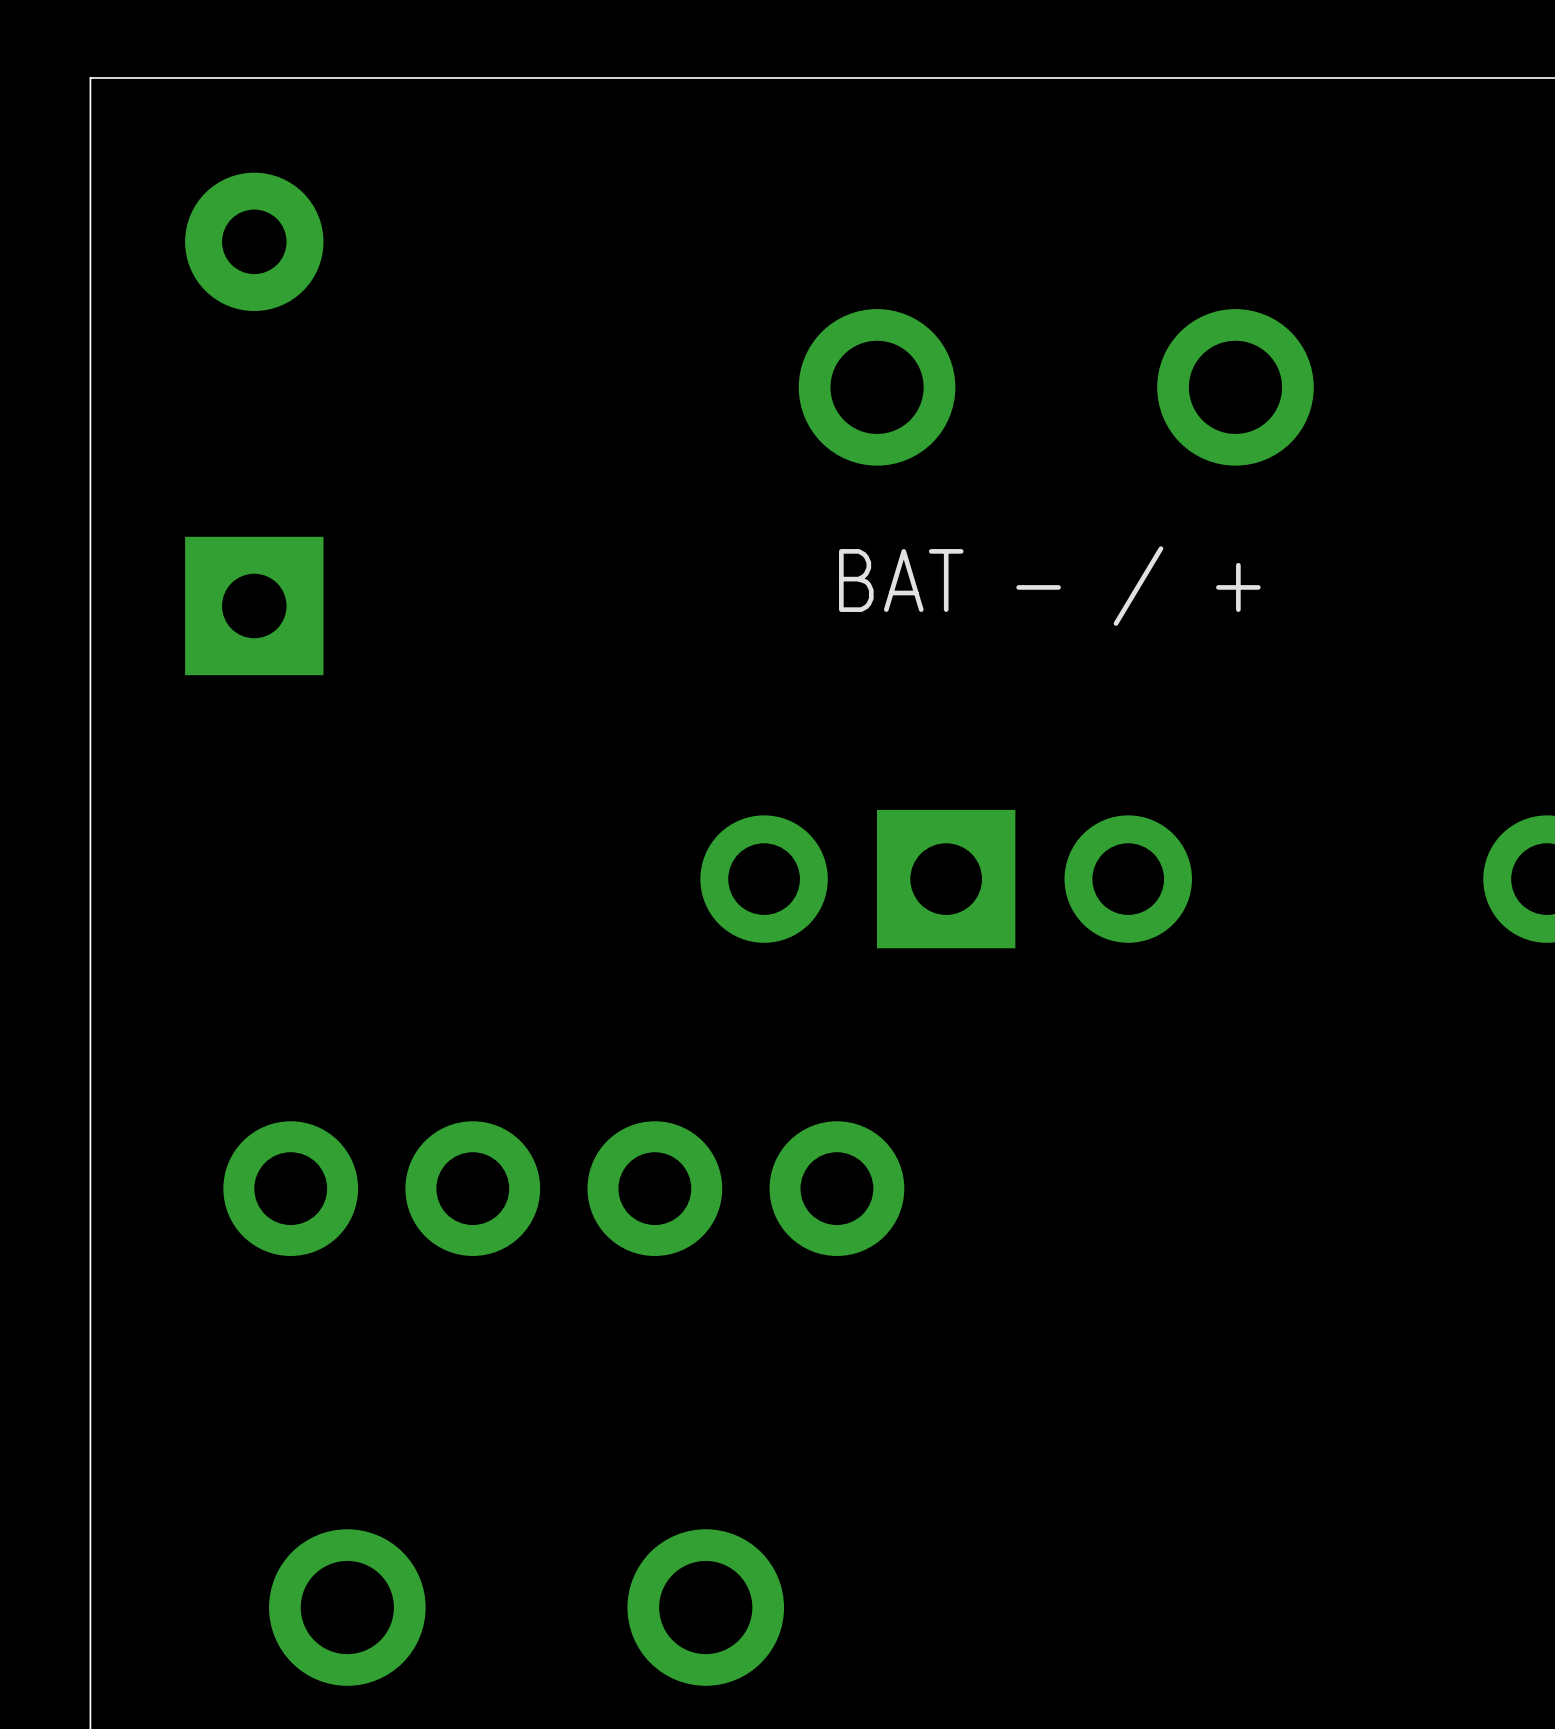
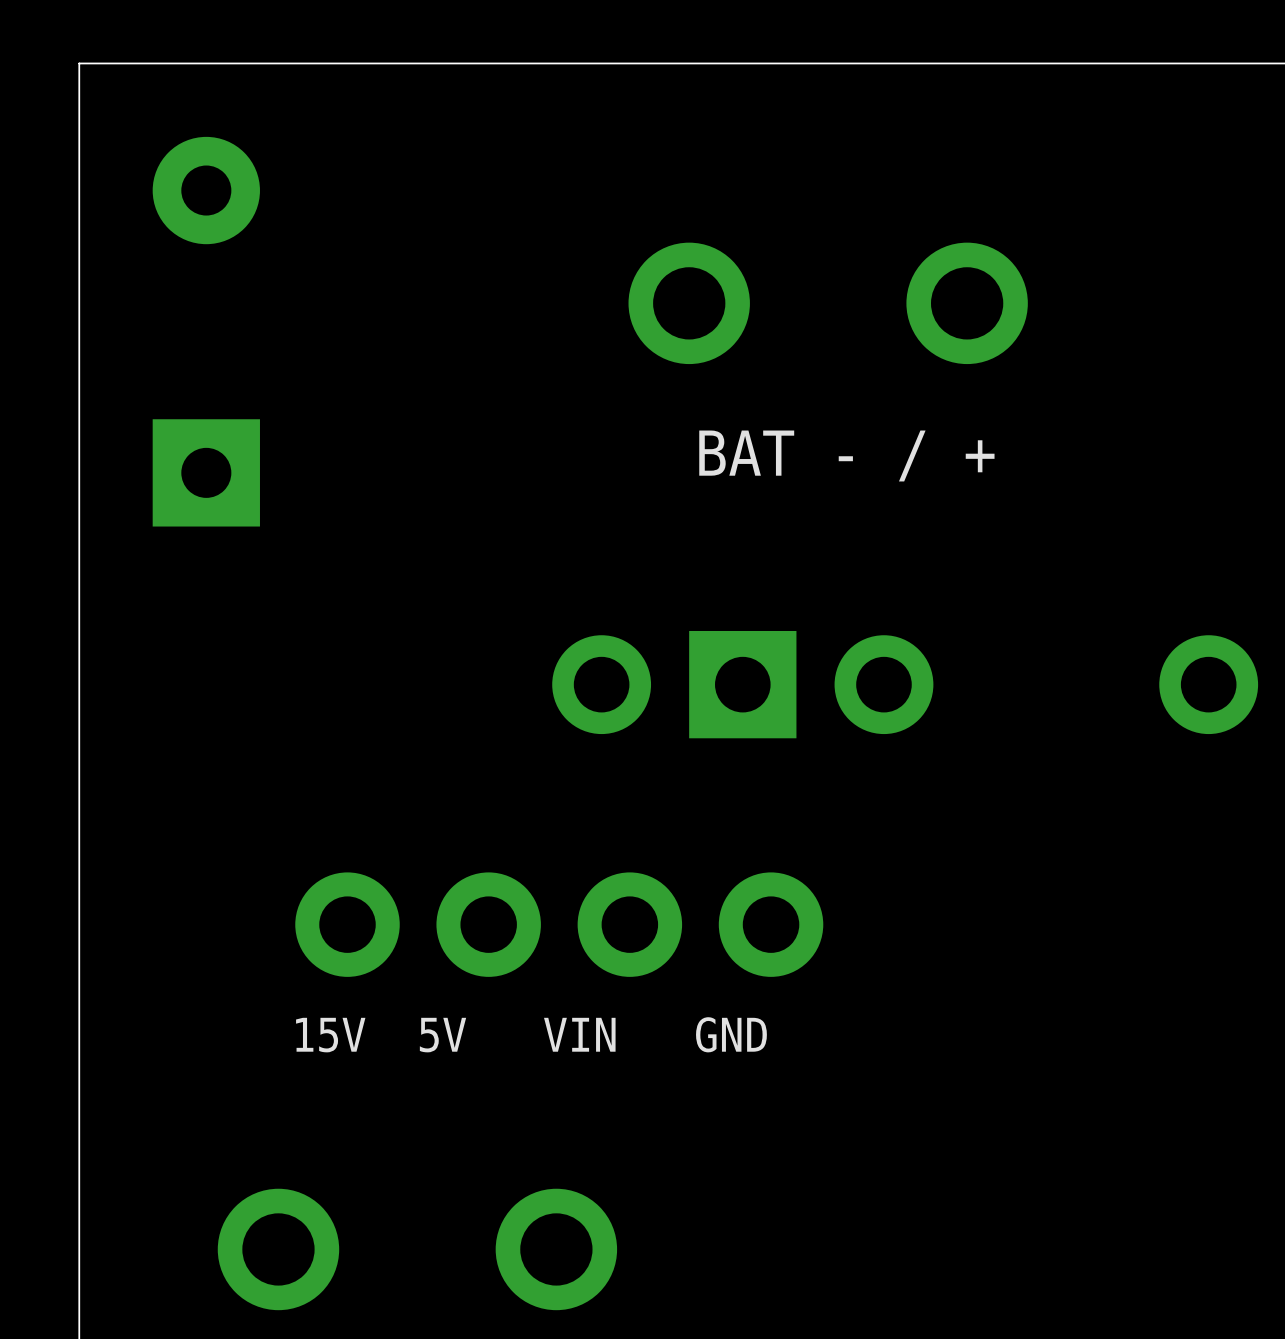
part position: (563, 1188) -> (559, 924)
text: none -> 15V 5V VIN GND (531, 1034)

